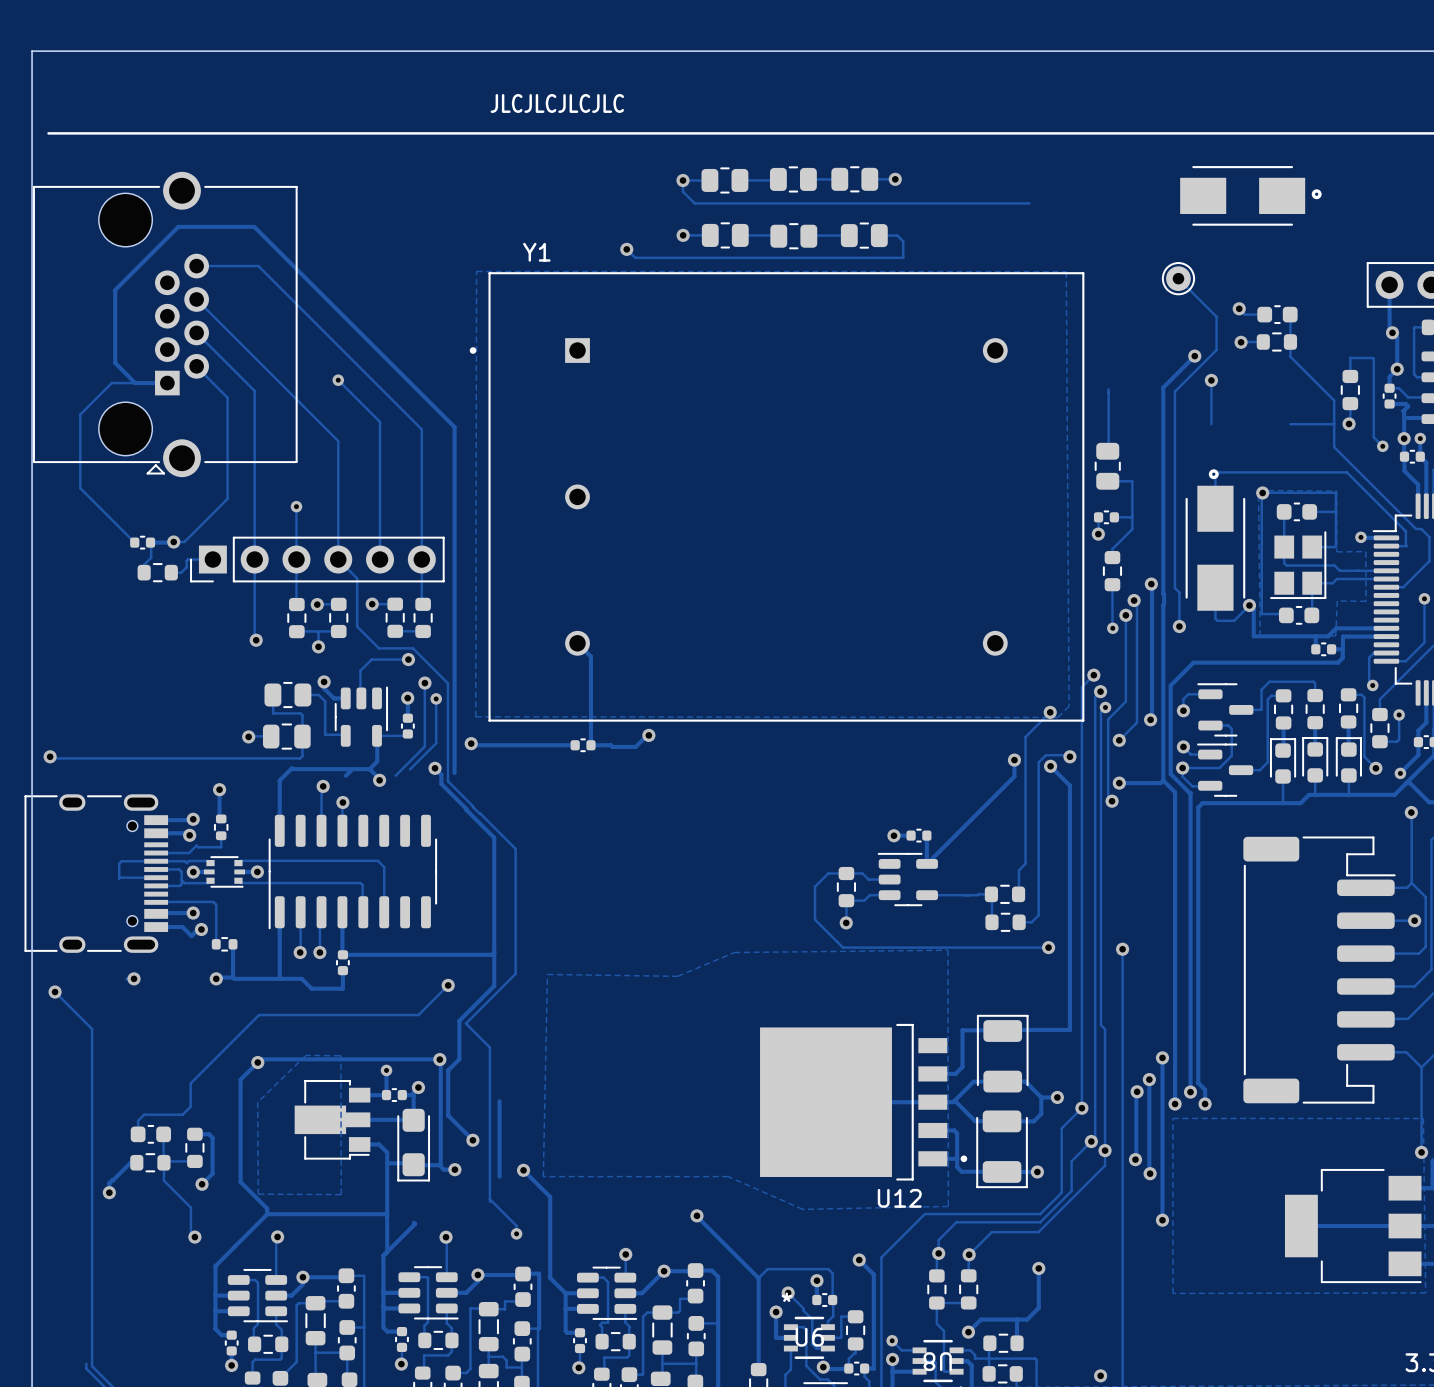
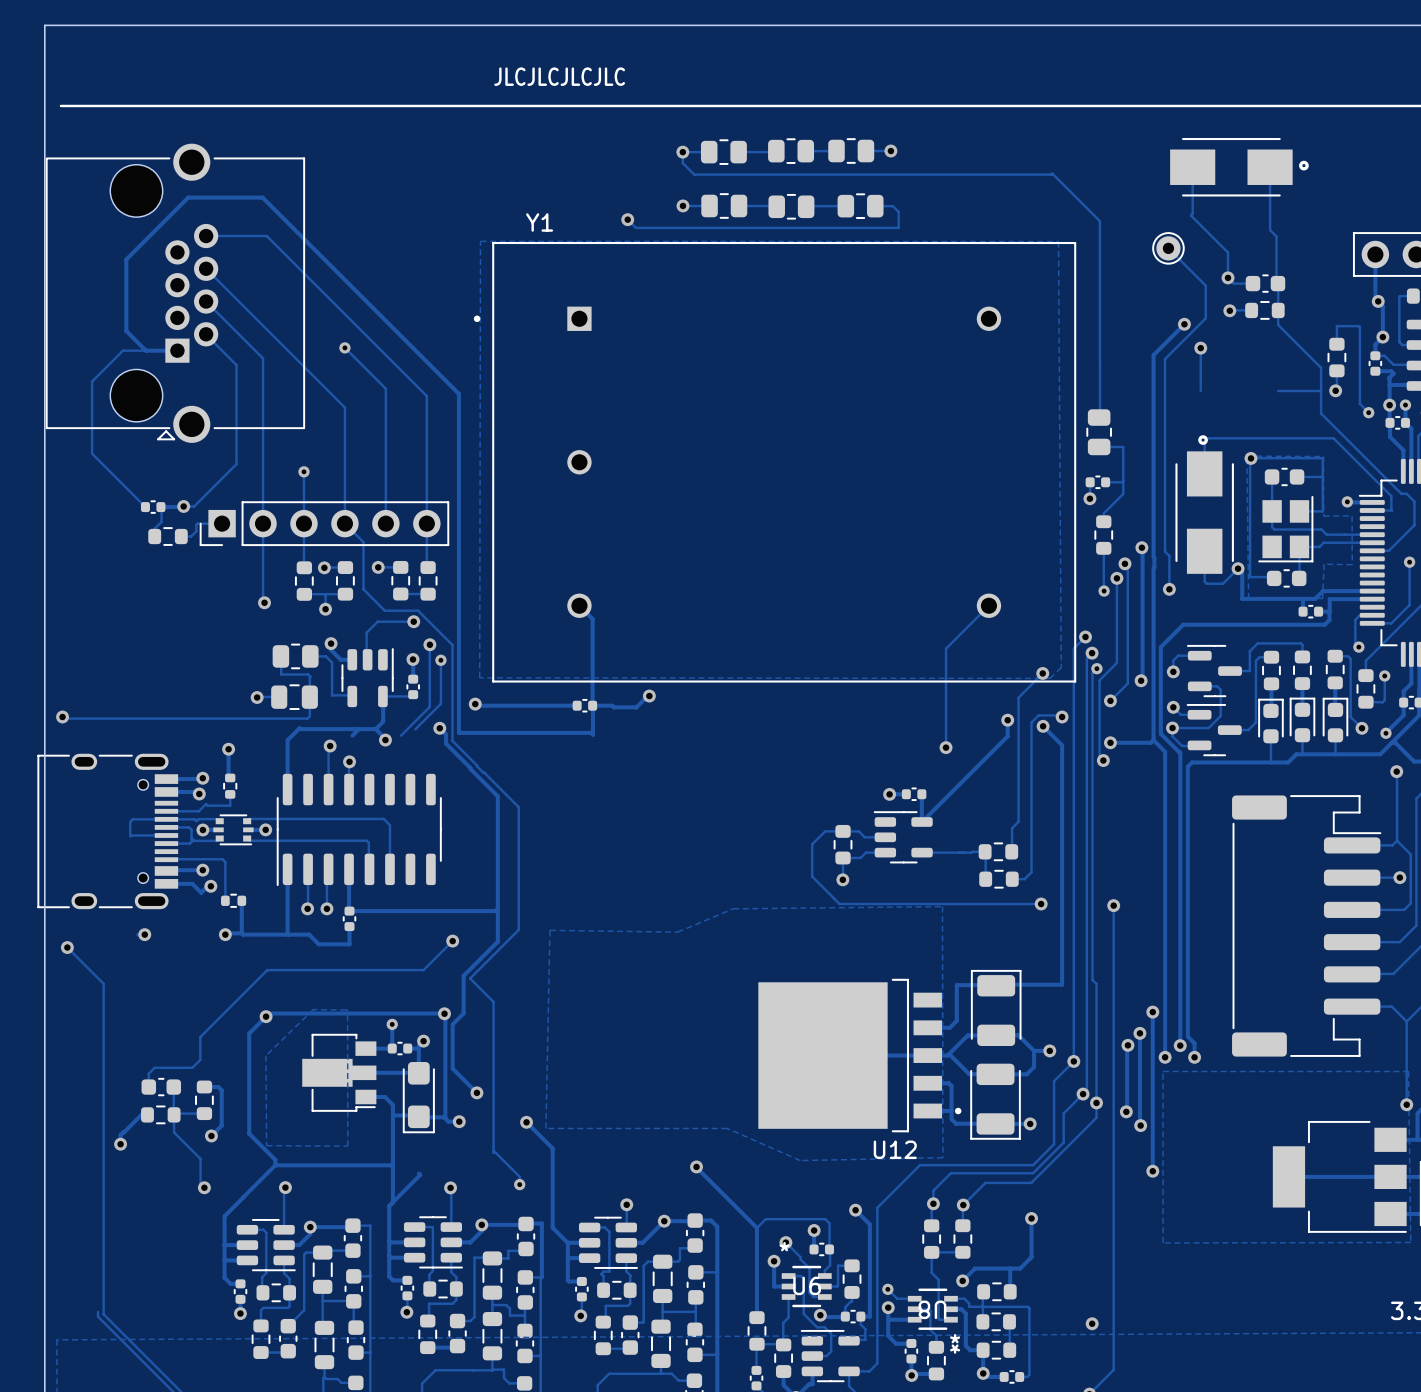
track: none -> (1192, 167) (1192, 213) (1191, 215) (1228, 252) (1228, 277)
track: none -> (1270, 167) (1270, 230) (1276, 236) (1277, 283)
track: none -> (1022, 174) (1052, 173) (1099, 221) (1099, 356)
track: none -> (988, 605) (946, 648) (946, 747)
track: none -> (592, 705) (592, 734) (591, 732) (458, 732)
via: none -> (946, 747)
track: (499, 1101) (499, 1176) -> none

